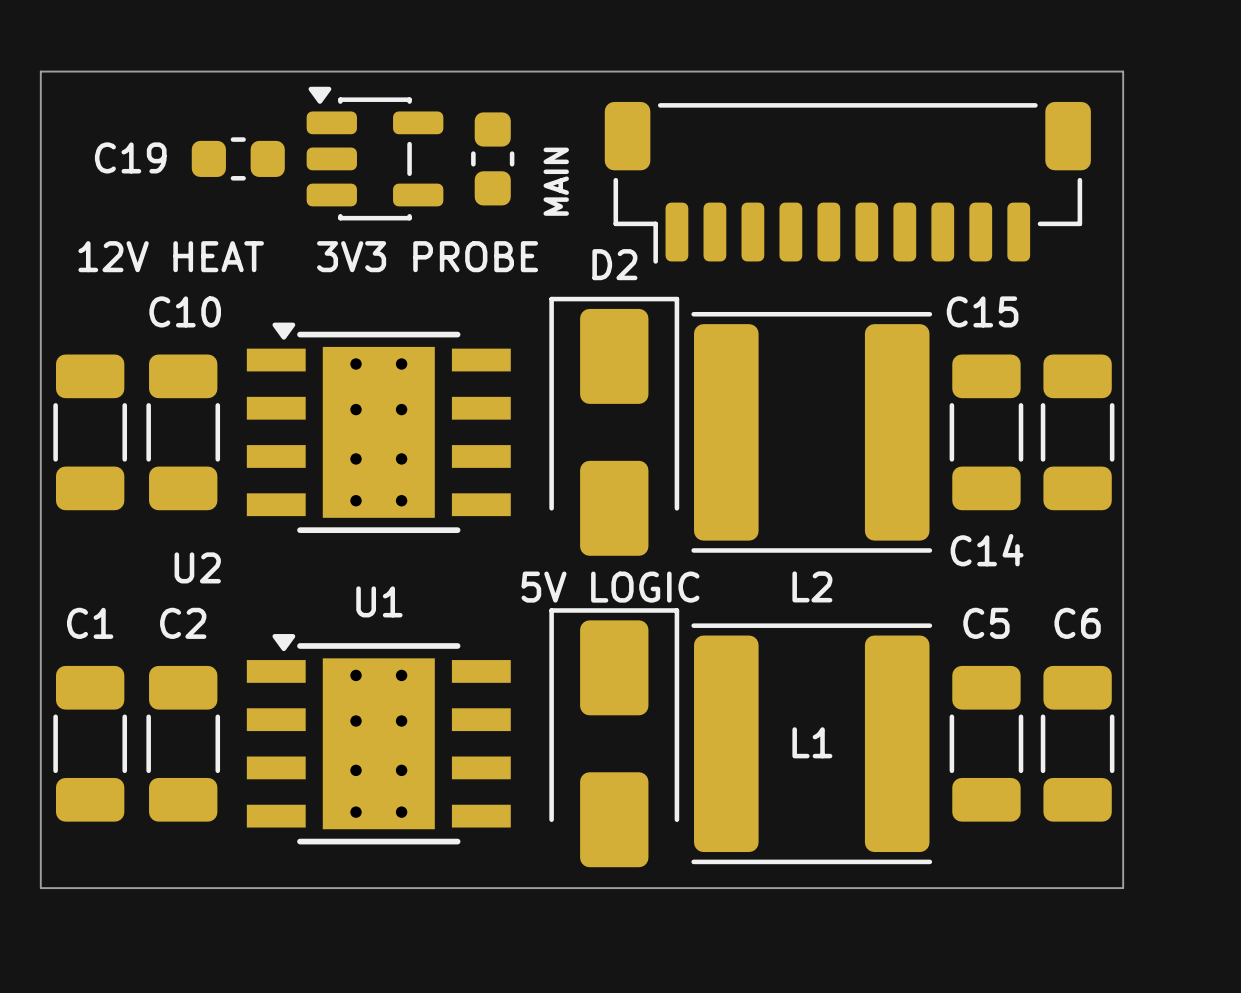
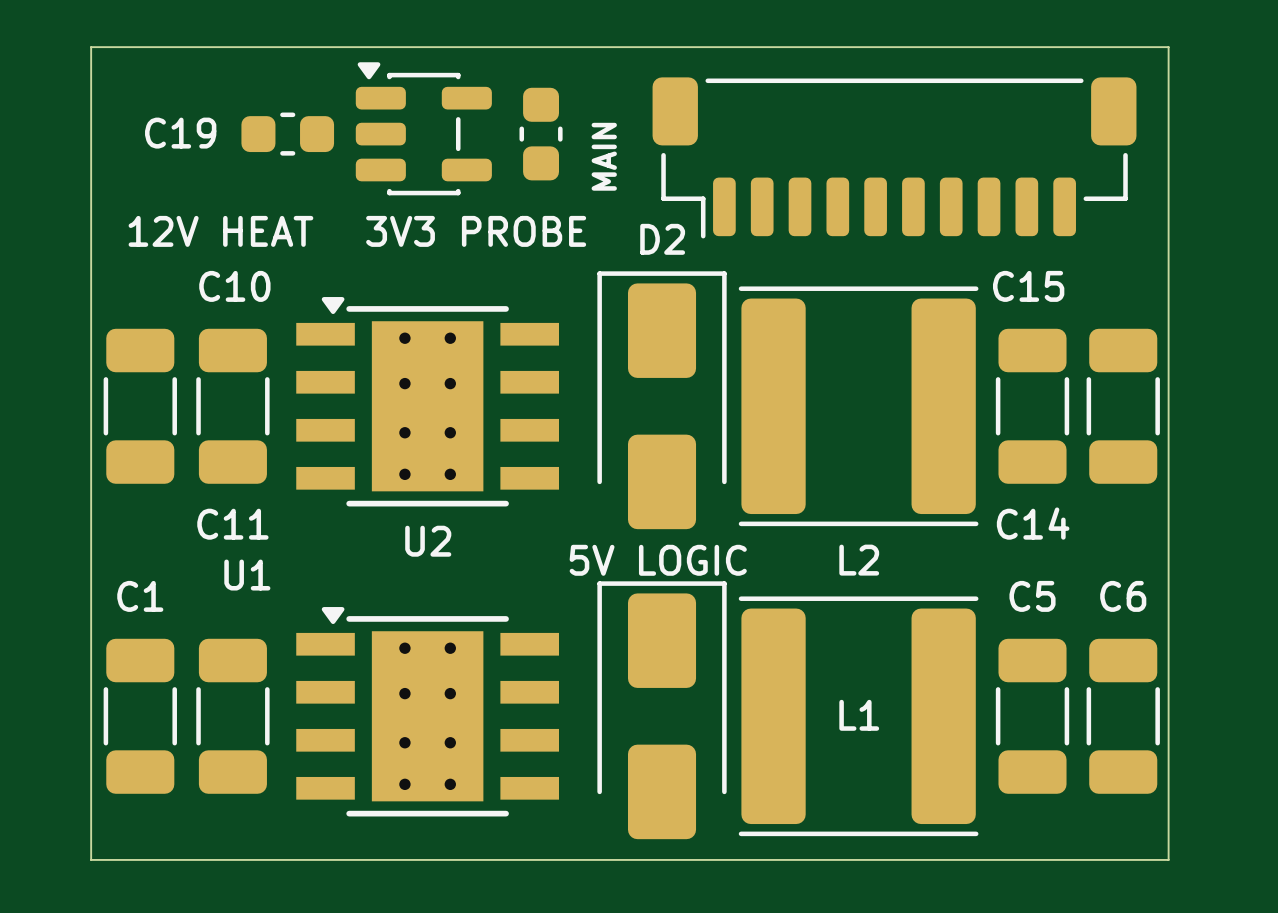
C11 name: none -> C11 (232, 524)
U2 name position: U2 (197, 567) -> U2 (428, 541)
U1 name position: U1 (379, 601) -> U1 (247, 575)
C2 name: C2 (183, 623) -> none

